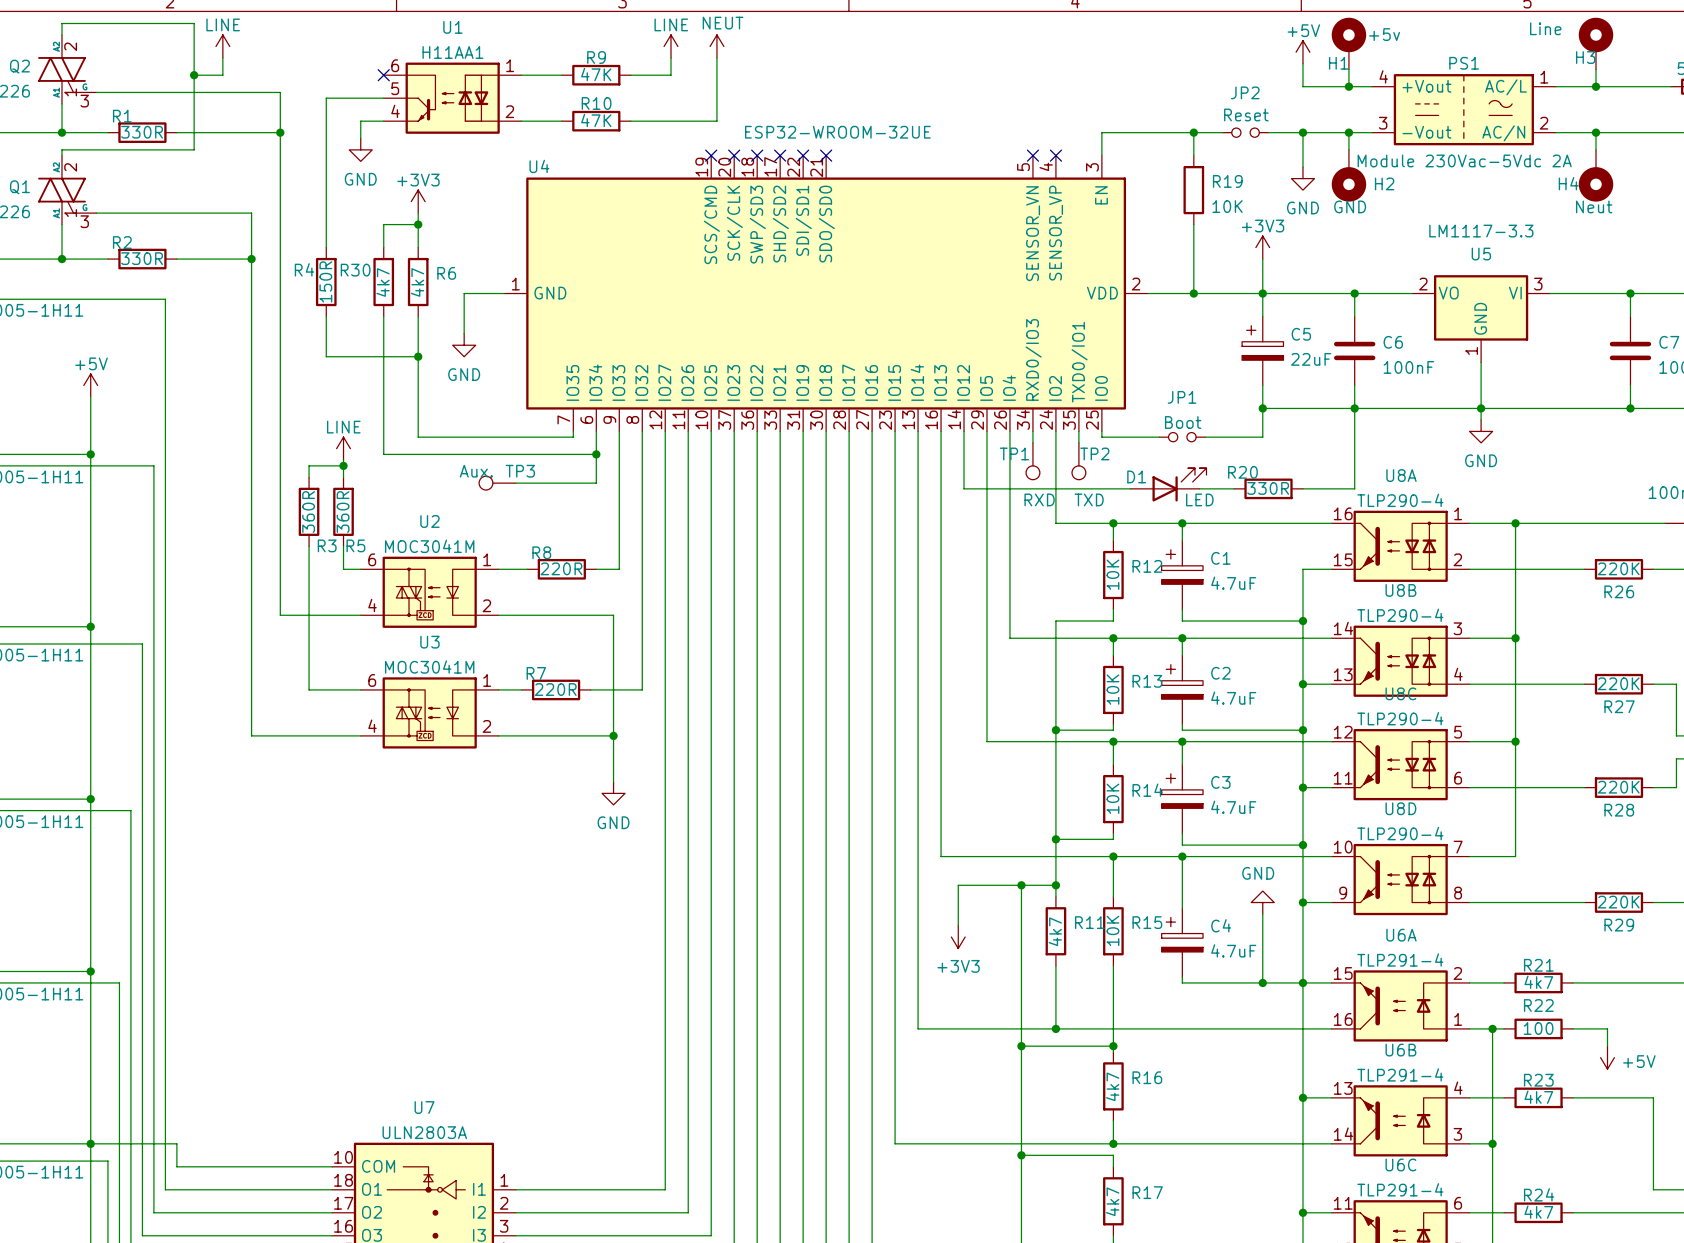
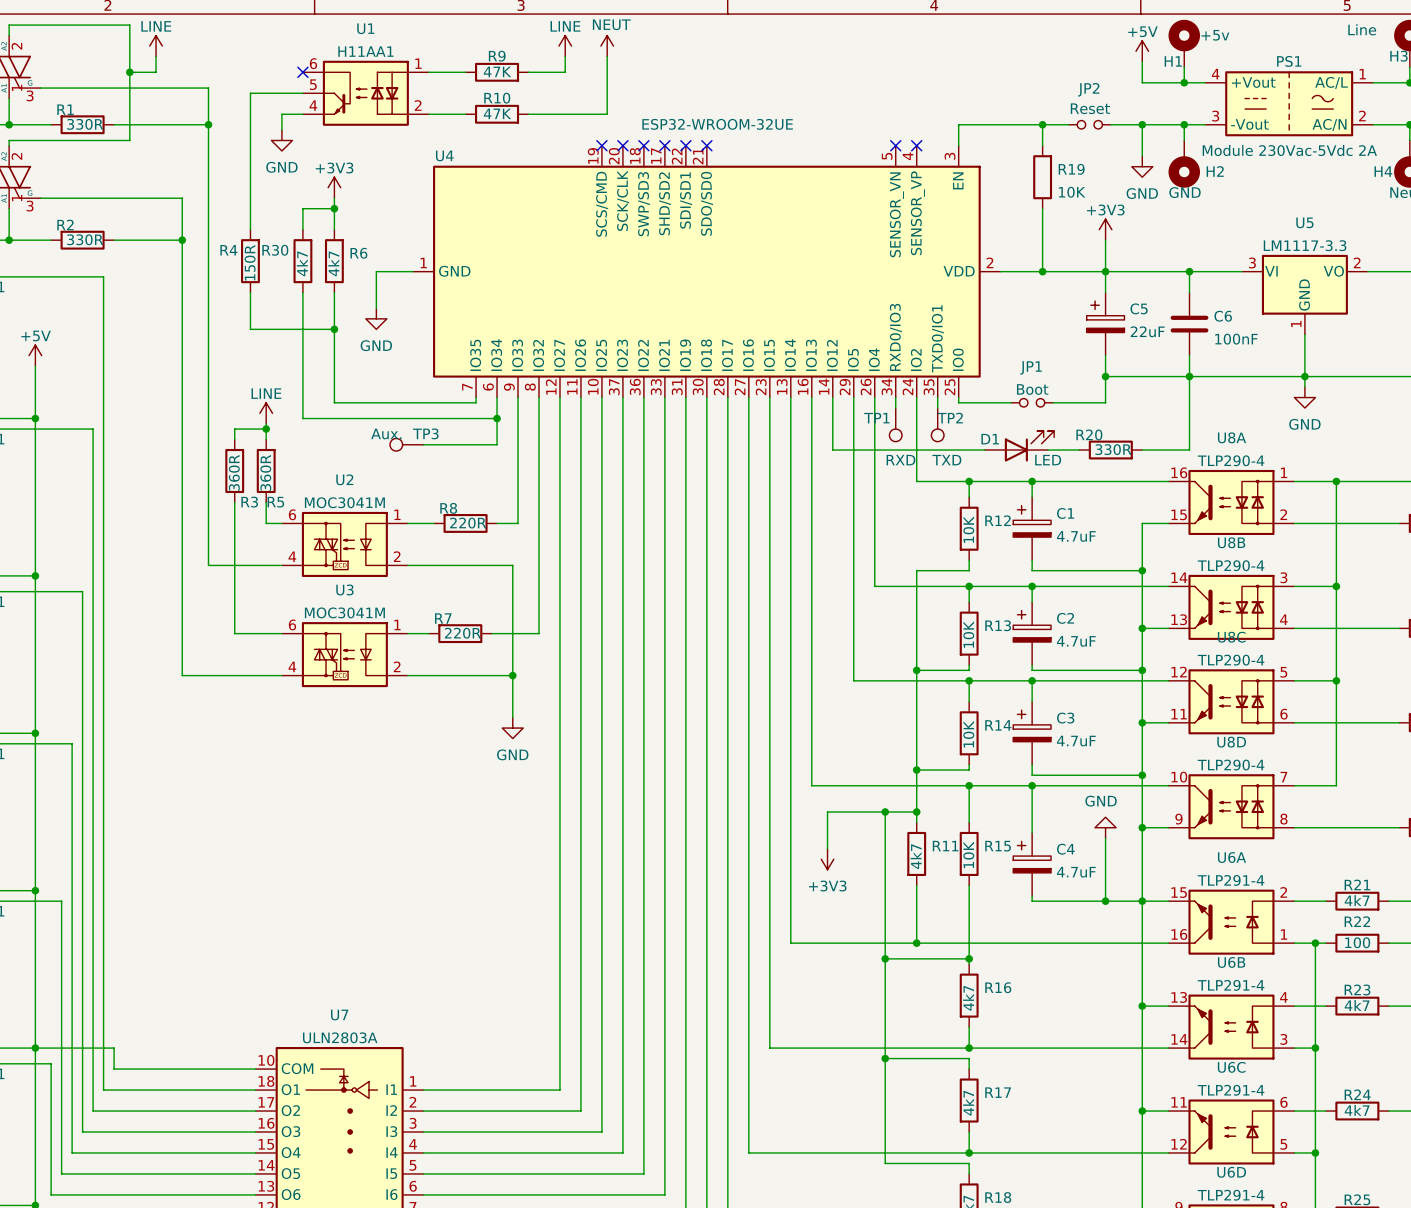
U5 value position: LM1117-3.3 (1481, 231) -> LM1117-3.3 (1305, 245)
U5 flip: as is (1481, 307) -> left-right (1304, 284)

